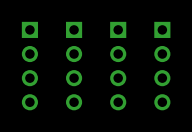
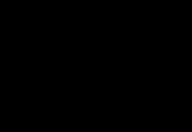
part: (29, 66) -> none
part: (74, 66) -> none
part: (118, 66) -> none
part: (162, 66) -> none

